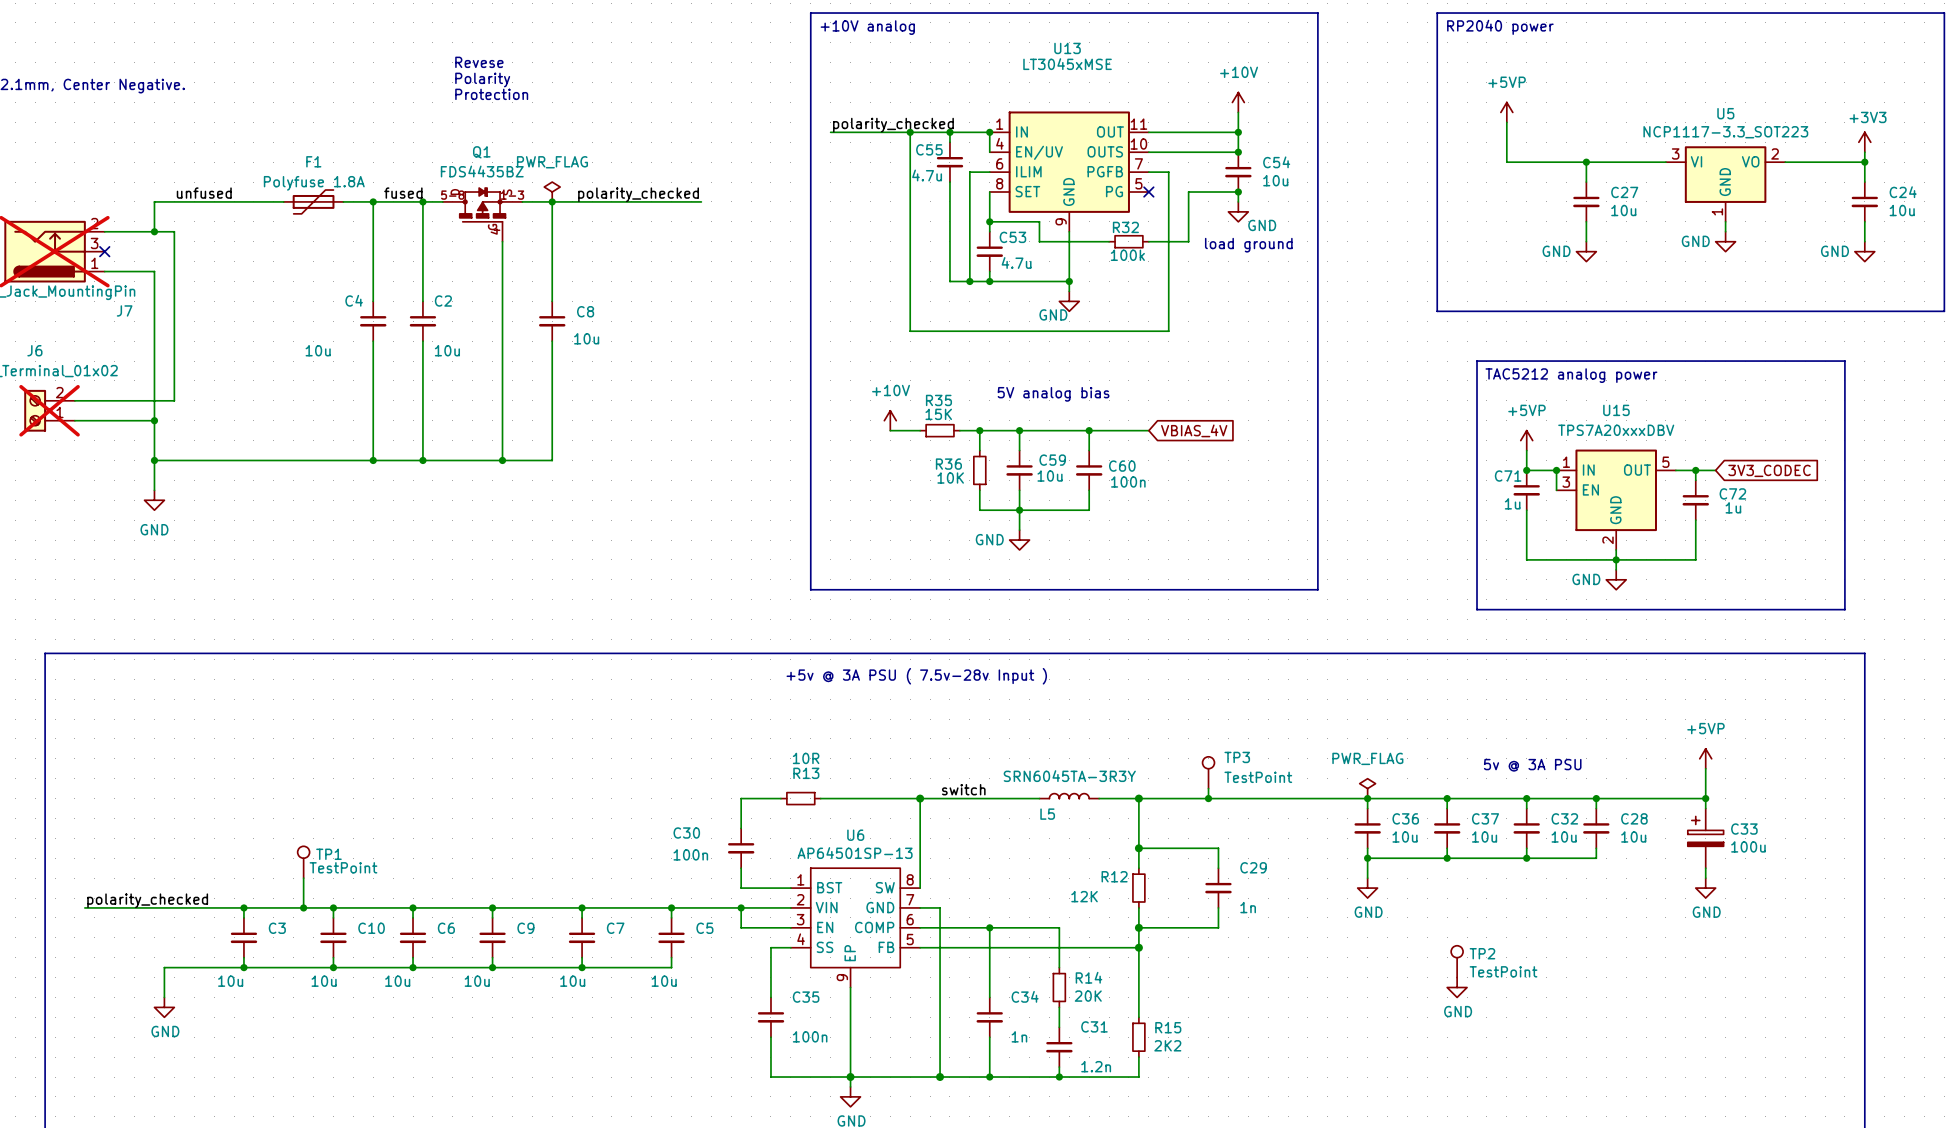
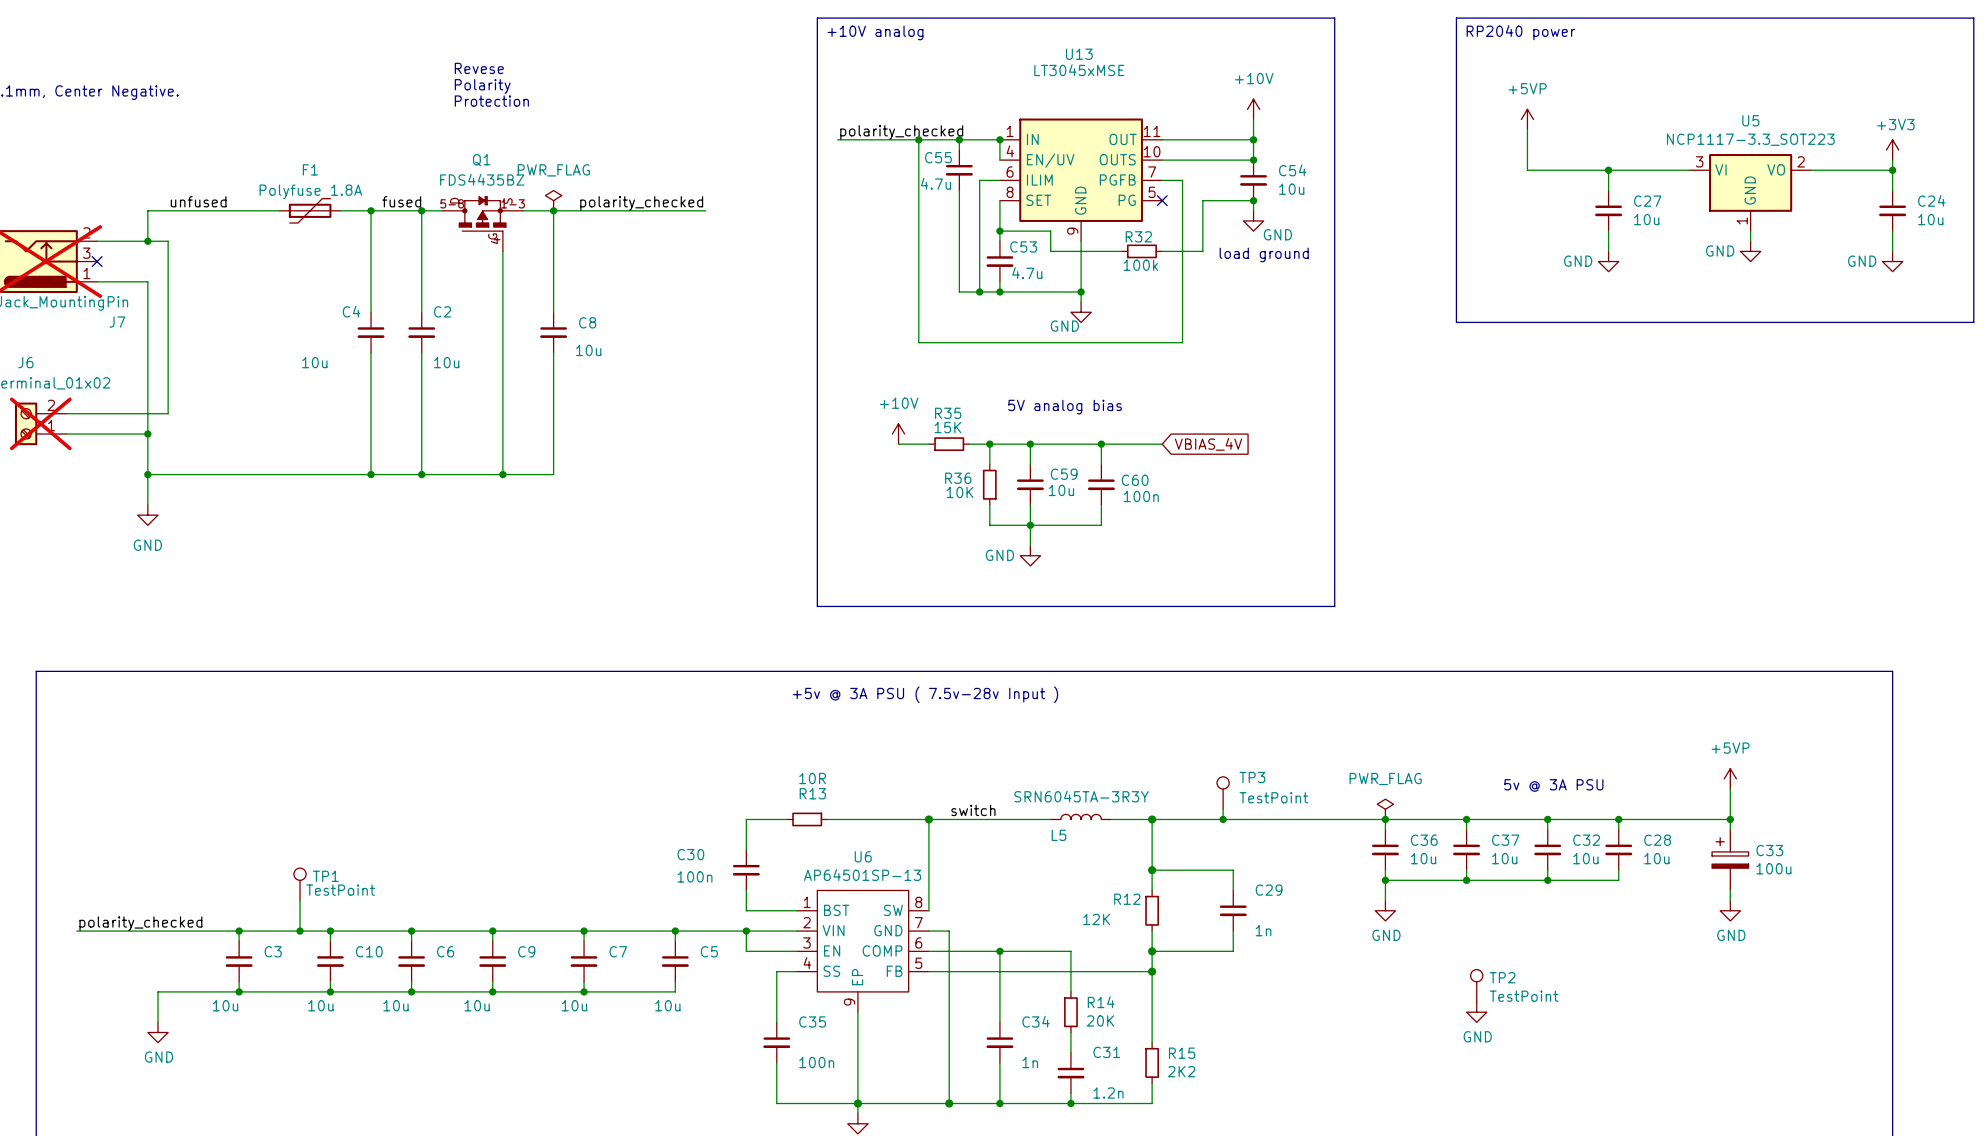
line: (1477, 361) (1844, 361) (1844, 609) (1477, 609) (1477, 361) -> none
text: TAC5212 analog power (1571, 375) -> none
power symbol: +5VP (1526, 440) -> none
wire: (1526, 450) (1526, 470) (1556, 470) (1556, 490) -> none
junction: (1526, 470) -> none
junction: (1556, 470) -> none
wire: (1675, 470) (1715, 470) -> none
wire: (1695, 470) (1695, 480) -> none
junction: (1695, 470) -> none
global label: 3V3_CODEC (1769, 470) -> none
C71: 1u (1526, 490) -> none
U15: TPS7A20xxxDBV (1616, 499) -> none
C72: 1u (1695, 500) -> none
wire: (1526, 510) (1526, 559) (1695, 559) (1695, 520) -> none
wire: (1616, 549) (1616, 569) -> none
junction: (1616, 559) -> none
power symbol: GND (1616, 579) -> none

